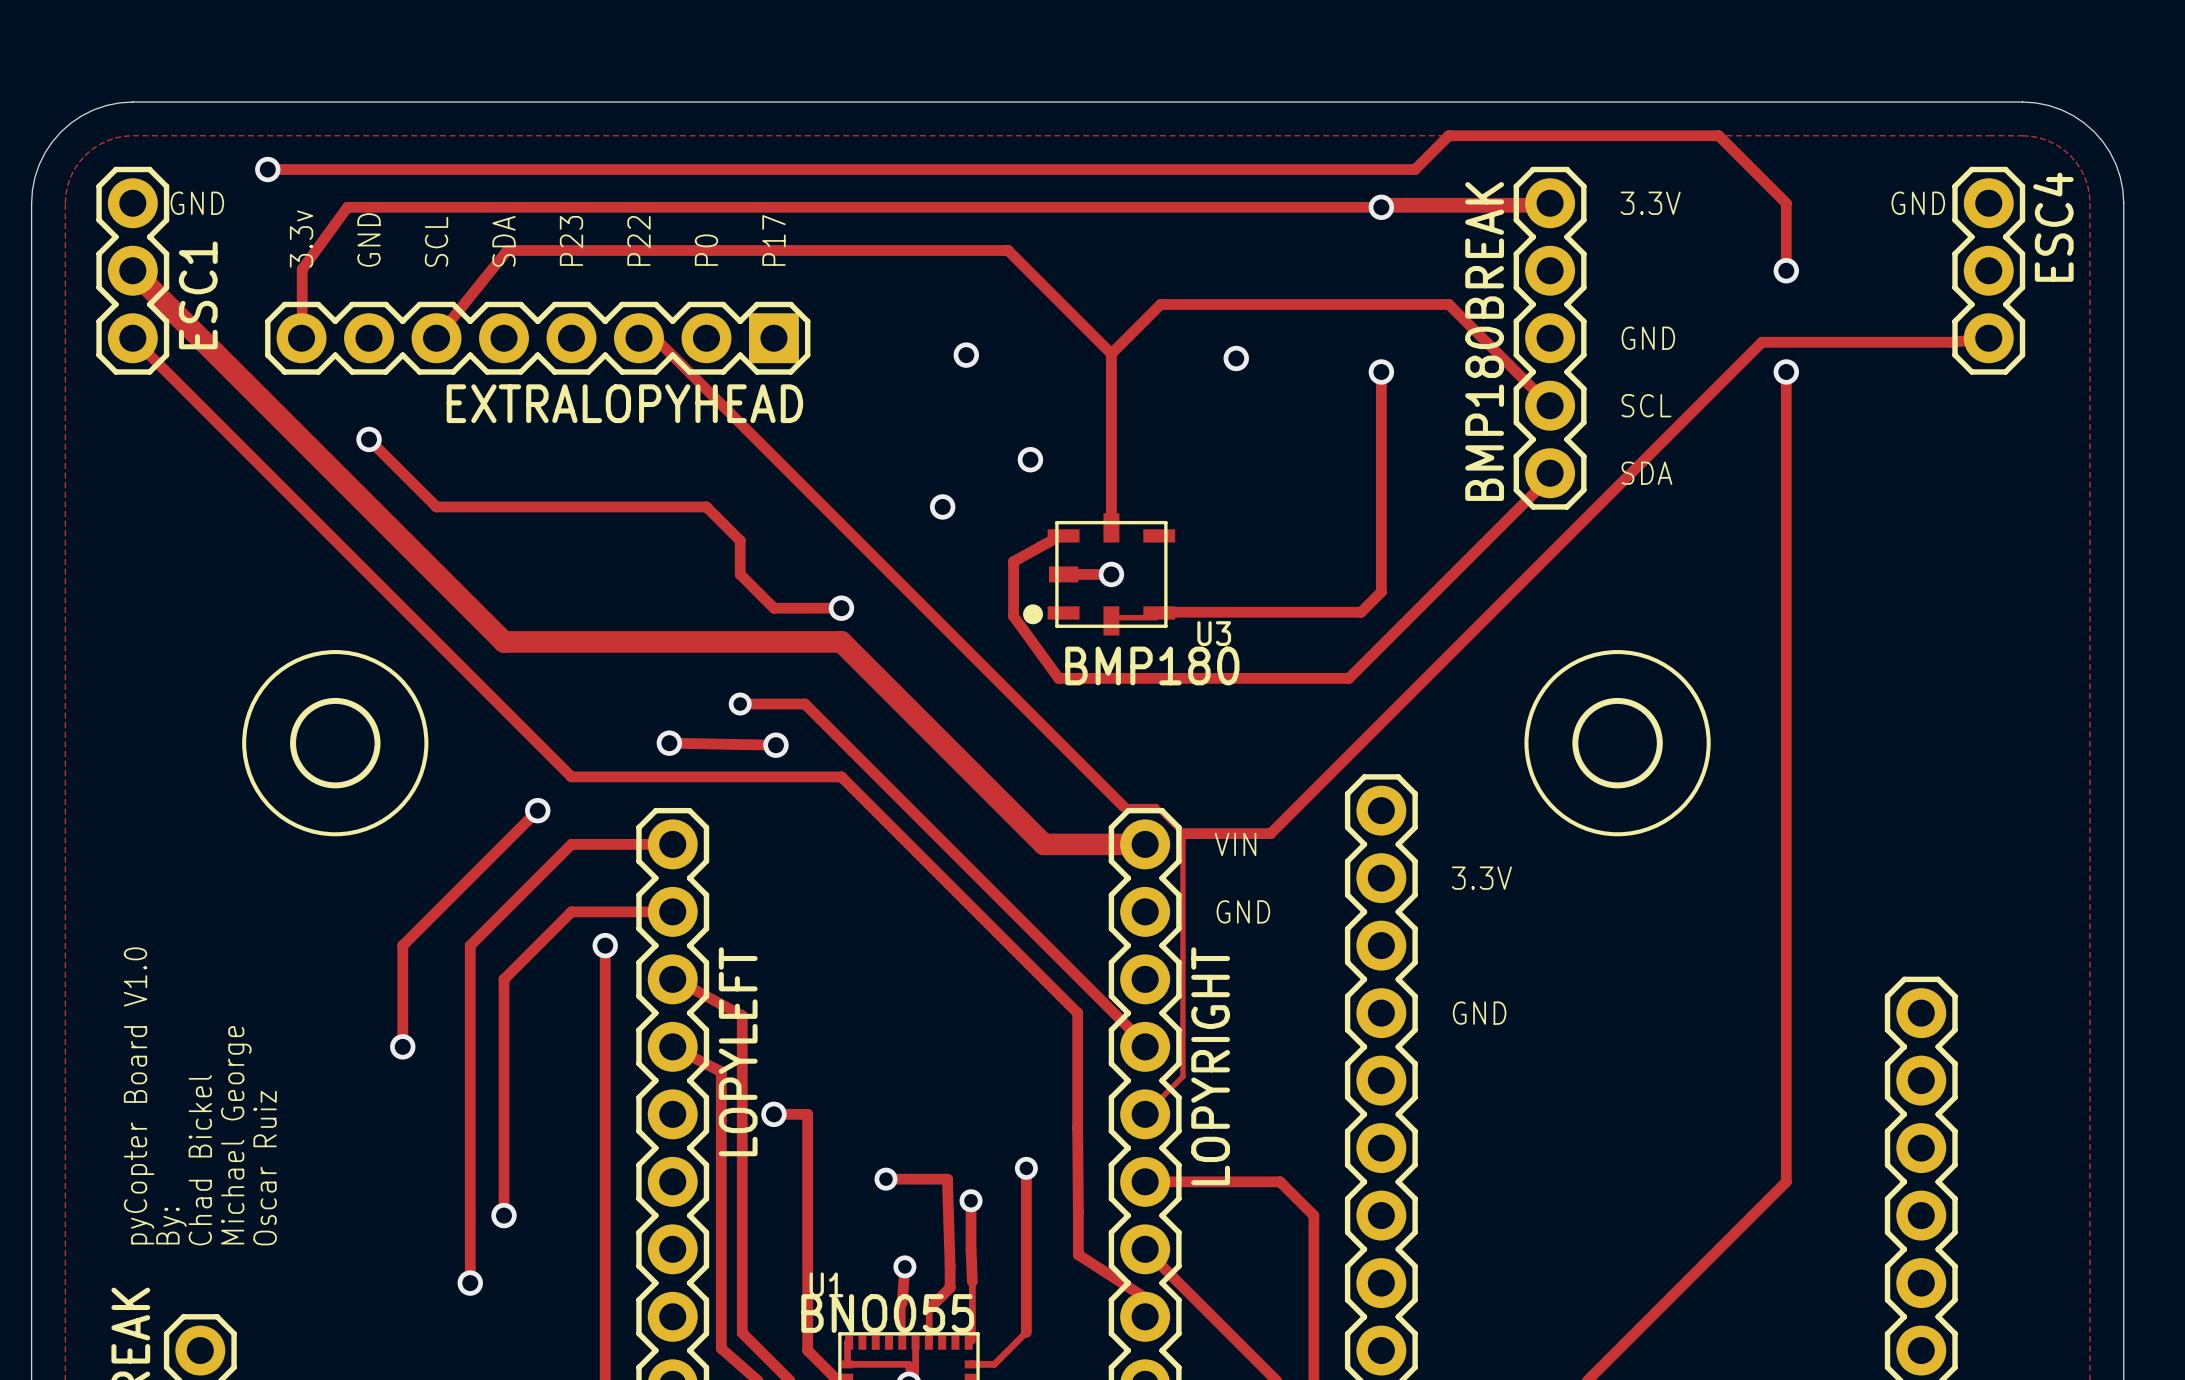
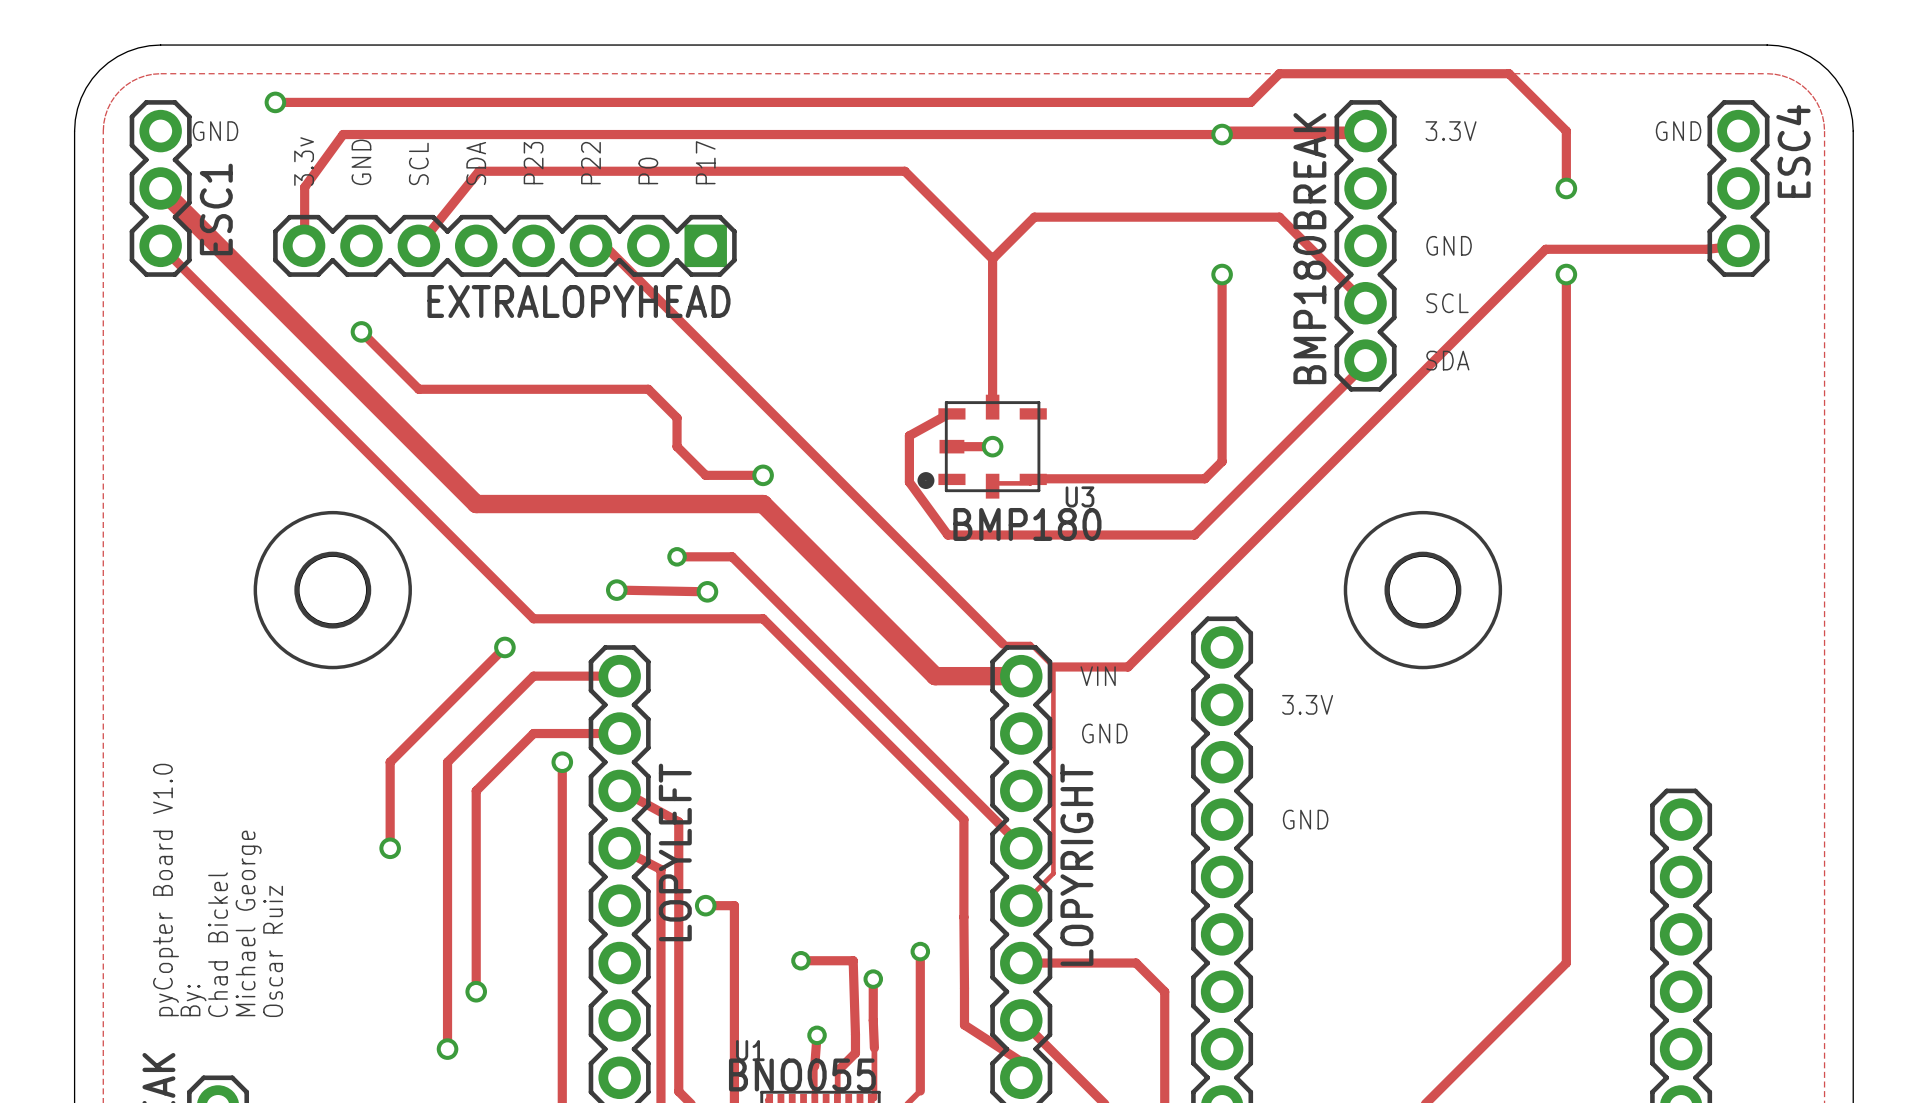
via: (966, 355) -> none
via: (1236, 358) -> none
via: (1030, 459) -> none
via: (942, 506) -> none

